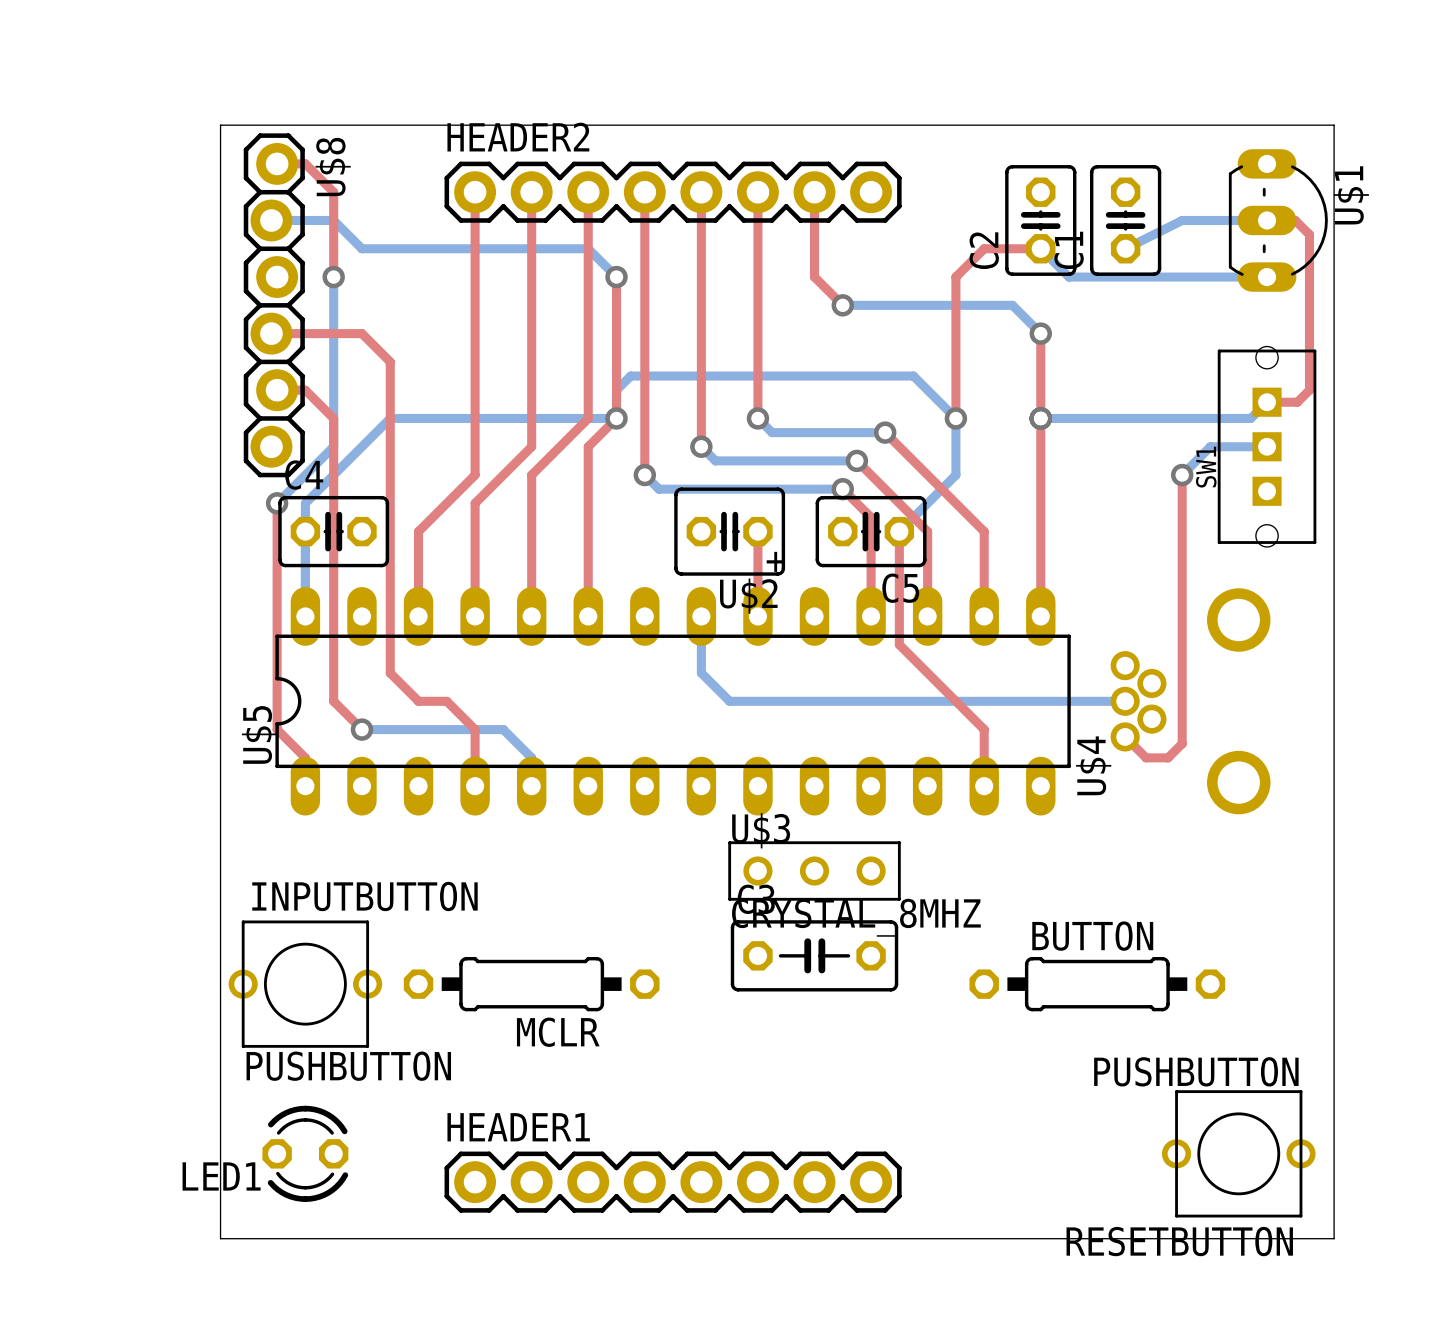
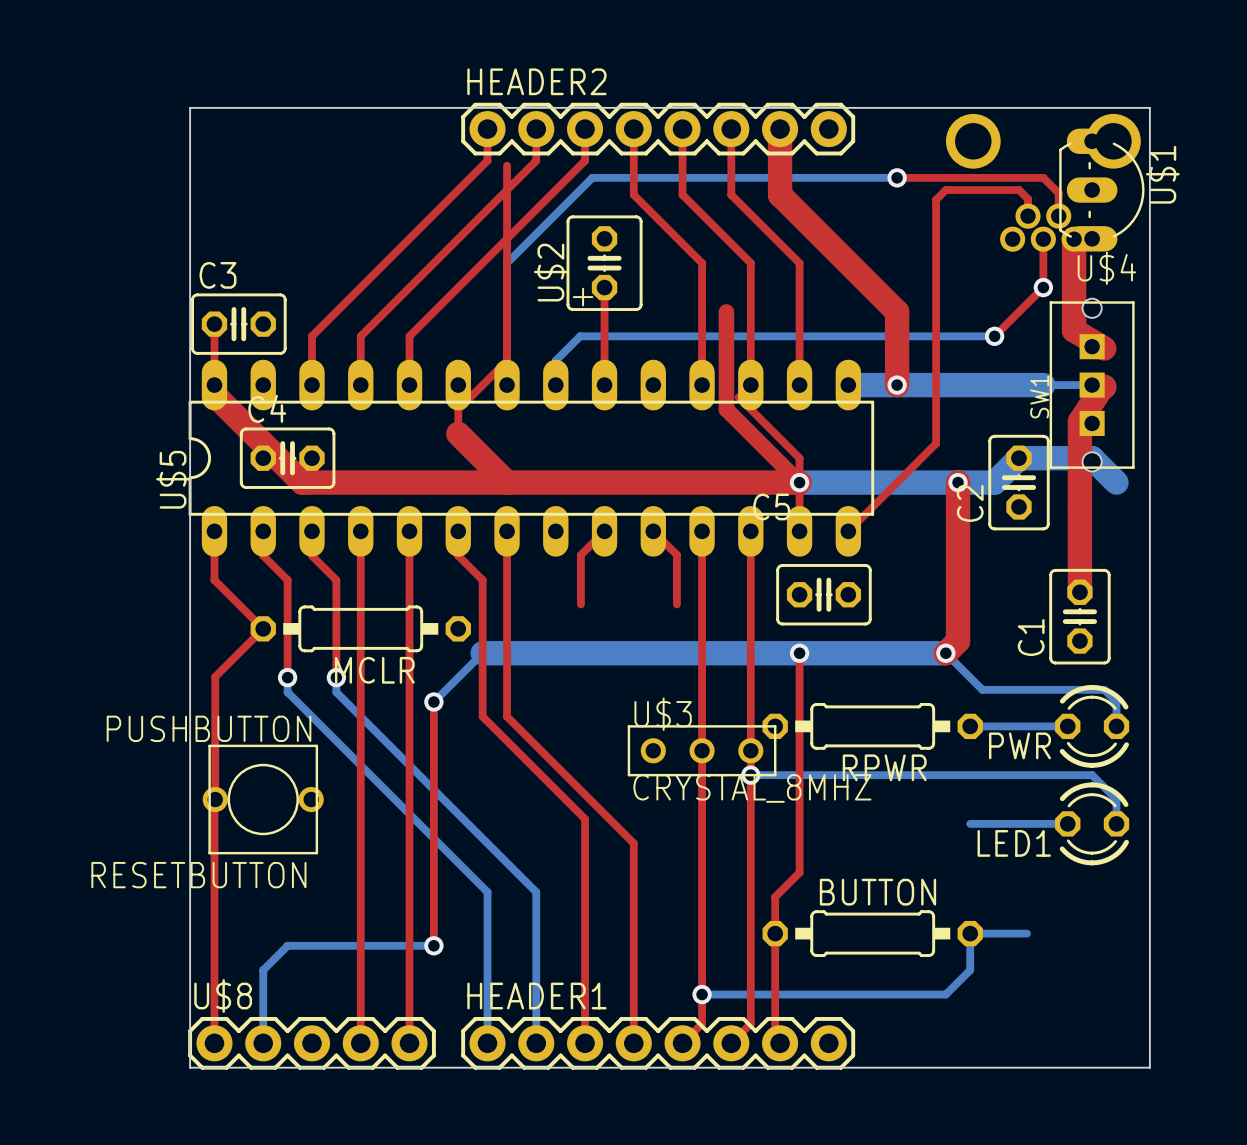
U$8 footprint: [243, 133, 305, 478] -> [188, 1016, 436, 1070]
top track: none -> (487, 129) (487, 160) (312, 336) (312, 385)
top track: none -> (536, 129) (536, 160) (360, 336) (360, 385)
top track: none -> (633, 129) (633, 194) (702, 263) (702, 385)
top track: none -> (682, 129) (682, 194) (750, 263) (750, 385)
top track: none -> (731, 129) (731, 194) (799, 263) (799, 385)
top track: (277, 163) (305, 163) (333, 192) (333, 277) -> none
U$8 name position: U$8 (333, 167) -> U$8 (223, 996)
top track: (475, 192) (475, 390) -> (585, 129) (585, 160) (409, 336)
top track: (531, 192) (531, 446) (475, 503) (475, 616) -> none
top track: (644, 192) (644, 475) -> none
HEADER2 position: (673, 192) -> (658, 129)
top track: (701, 192) (701, 333) -> none
top track: (757, 192) (757, 418) -> none
top track: (814, 192) (814, 277) (842, 305) -> none
top track: none -> (897, 177) (1043, 177) (1058, 193) (1058, 216)
bottom track: none -> (897, 177) (592, 177) (507, 263) (507, 385)
via: none -> (897, 177)
bottom track: (271, 220) (333, 220) (361, 248) (588, 248) (616, 277) -> none
C2 position: (1040, 220) -> (1018, 482)
C1 position: (1125, 220) -> (1079, 616)
top track: (1267, 220) (1295, 220) (1309, 234) (1309, 390) (1297, 402) (1267, 402) -> none
bottom track: (1267, 220) (1182, 220) (1125, 248) -> none
top track: (1040, 248) (984, 248) (955, 277) (955, 418) -> none
bottom track: (1040, 248) (1069, 277) (1267, 277) -> none
bottom track: (333, 277) (333, 446) (277, 503) -> none
via: (333, 277) -> none
top track: (616, 277) (616, 418) (588, 446) (588, 616) -> (633, 1043) (633, 843) (507, 716) (507, 531)
via: (616, 277) -> none
top track: none -> (1043, 238) (1043, 287) (994, 336)
top track: none -> (1074, 239) (1074, 330) (1104, 348)
bottom track: (842, 305) (1012, 305) (1040, 333) -> none
via: (842, 305) -> none
top track: (271, 333) (361, 333) (390, 361) (390, 673) (418, 701) (446, 701) (475, 729) -> (409, 531) (409, 628)
top track: (1040, 333) (1040, 361) -> (780, 129) (780, 194) (897, 311)
via: (1040, 333) -> none
via: none -> (1043, 287)
top track: none -> (726, 311) (726, 409) (799, 482) (302, 482) (214, 394) (214, 324)
top track width: thin (1040, 361) (1040, 446) -> thick (897, 311) (897, 385)
top track: (277, 390) (305, 390) (333, 418) (333, 673) -> (263, 531) (263, 555) (287, 580)
bottom track: none -> (994, 336) (580, 336) (555, 360) (555, 385)
via: none -> (994, 336)
bottom track: (1267, 402) (1250, 418) (1040, 418) -> none
via: (616, 418) -> none
bottom track: (757, 418) (772, 432) (885, 432) -> none
via: (757, 418) -> none
via: (955, 418) -> none
via position: (1040, 418) -> (897, 385)
top track: (885, 432) (984, 531) (984, 616) -> (1028, 216) (1028, 199) (1018, 190) (945, 190) (936, 199) (936, 443) (848, 531)
via: (885, 432) -> none
top track: (475, 446) (475, 475) (418, 531) (418, 616) -> (360, 1043) (360, 531)
bottom track: (701, 446) (715, 460) (856, 460) -> none
via: (701, 446) -> none
top track: (1040, 446) (1040, 616) -> none
bottom track: (1210, 446) (1182, 475) -> (1043, 385) (848, 385)
top track: none -> (1104, 386) (1079, 421) (1079, 592)
via: (856, 460) -> none
bottom track: (644, 475) (658, 489) (842, 489) -> none
via: (644, 475) -> none
top track: (1182, 475) (1182, 743) (1168, 757) (1146, 757) (1125, 736) -> none
via: (1182, 475) -> none
U$2 footprint: [674, 487, 786, 576] -> [566, 215, 643, 311]
top track: (842, 489) (871, 517) (871, 616) -> (731, 1043) (750, 1023) (750, 531)
via: (842, 489) -> none
top track: (277, 503) (277, 729) (305, 757) (305, 786) -> none
via: (277, 503) -> none
top track: (531, 503) (531, 616) -> (458, 433) (507, 482)
top track: (757, 531) (757, 616) -> (676, 604) (676, 554) (653, 531)
C5 position: (871, 531) -> (823, 594)
top track: (899, 531) (899, 644) (984, 729) (984, 786) -> none
bottom track: (899, 531) (955, 475) (955, 418) (913, 376) (630, 376) (616, 390) (616, 418) (390, 418) (305, 503) (305, 616) -> none
bottom track: none -> (799, 482) (994, 482) (1018, 458) (1092, 458) (1116, 482)
via: none -> (799, 482)
top track: none -> (958, 482) (958, 641) (945, 653)
via: none -> (958, 482)
U$2 name position: U$2 (748, 596) -> U$2 (550, 272)
top track: none -> (214, 531) (214, 580) (263, 628) (215, 676) (214, 1043)
top track: none -> (312, 531) (312, 555) (336, 580) (336, 677)
top track: none -> (458, 531) (458, 555) (482, 580) (482, 716) (585, 819) (585, 1043)
top track: none -> (604, 531) (580, 554) (580, 604)
bottom track: (701, 616) (701, 673) (729, 701) (1125, 701) -> none
top track: none -> (702, 531) (702, 1023) (682, 1043)
top track: (333, 701) (361, 729) -> (287, 604) (287, 677)
U$5 position: (673, 701) -> (531, 458)
U$4 rotation: 0° (1190, 701) -> 90° counterclockwise (1043, 182)
U$4 position: (1190, 701) -> (1043, 182)
bottom track: (361, 729) (503, 729) (531, 757) (531, 786) -> none
via: (361, 729) -> none
top track: none -> (799, 653) (799, 872) (775, 897) (775, 1038) (780, 1043)
via: none -> (799, 653)
via: none -> (945, 653)
bottom track: none -> (287, 677) (287, 692) (487, 892) (487, 1043)
via: none -> (287, 677)
bottom track: none -> (336, 677) (336, 692) (536, 892) (536, 1043)
via: none -> (336, 677)
top track: none -> (409, 677) (409, 1043)
top track: none -> (433, 702) (433, 945)
bottom track: none -> (433, 702) (482, 653) (945, 653) (982, 689) (1104, 689) (1116, 702) (1116, 726)
via: none -> (433, 702)
RPWR: none -> (872, 726)
bottom track: none -> (970, 726) (1067, 726)
PWR: none -> (1092, 726)
bottom track: none -> (750, 775) (1092, 775) (1116, 799) (1116, 823)
via: none -> (750, 775)
C3 footprint: [730, 920, 899, 992] -> [191, 293, 287, 355]
RESETBUTTON: none -> PUSHBUTTON (263, 799)
bottom track: none -> (970, 823) (1067, 823)
INPUTBUTTON: PUSHBUTTON (305, 984) -> none
MCLR position: (531, 984) -> (360, 628)
BUTTON position: (1097, 984) -> (872, 933)
bottom track: none -> (1027, 933) (970, 933) (970, 970) (945, 994) (702, 994)
bottom track: none -> (433, 945) (287, 945) (263, 970) (263, 1043)
via: none -> (433, 945)
LED1 position: (305, 1153) -> (1092, 823)
via: none -> (702, 994)
RESETBUTTON: PUSHBUTTON (1238, 1153) -> none
HEADER1 position: (673, 1182) -> (658, 1043)

